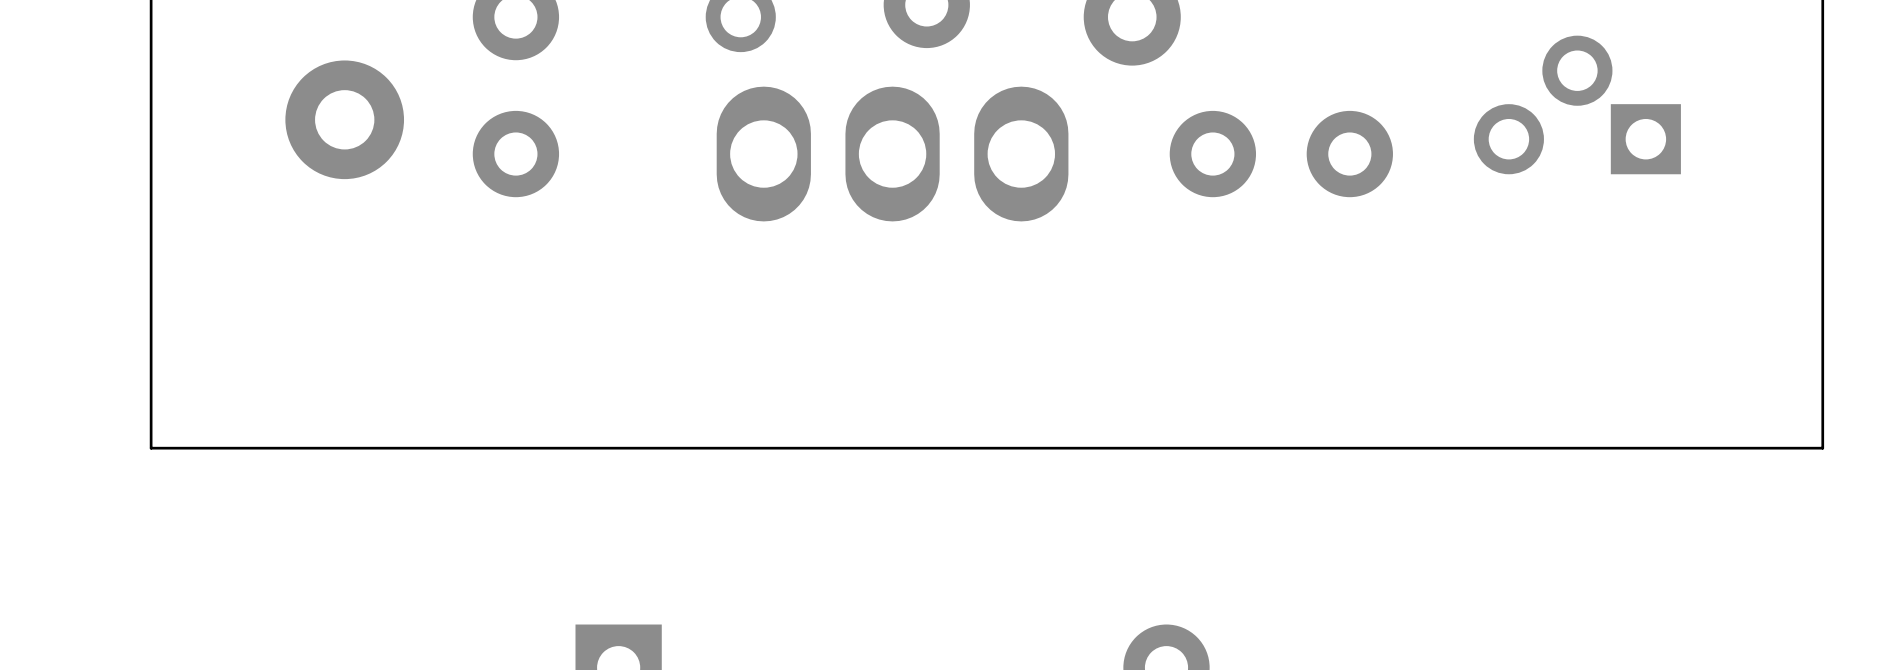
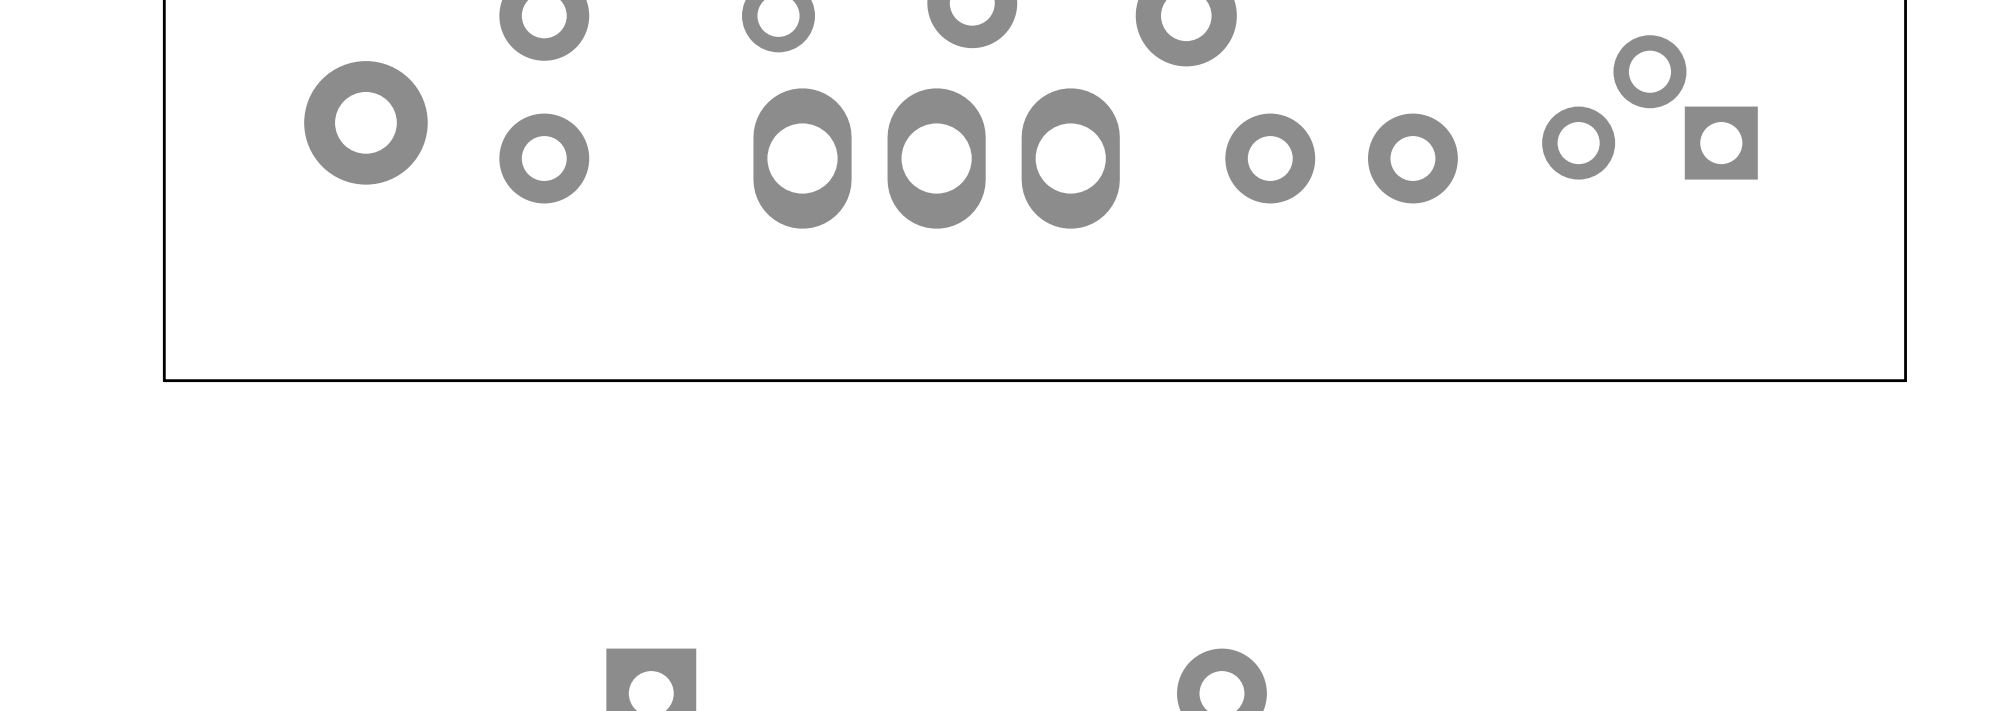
board edge: (1822, 367) (1822, 448) (151, 448) (151, 367) -> (1905, 380) (164, 380)

